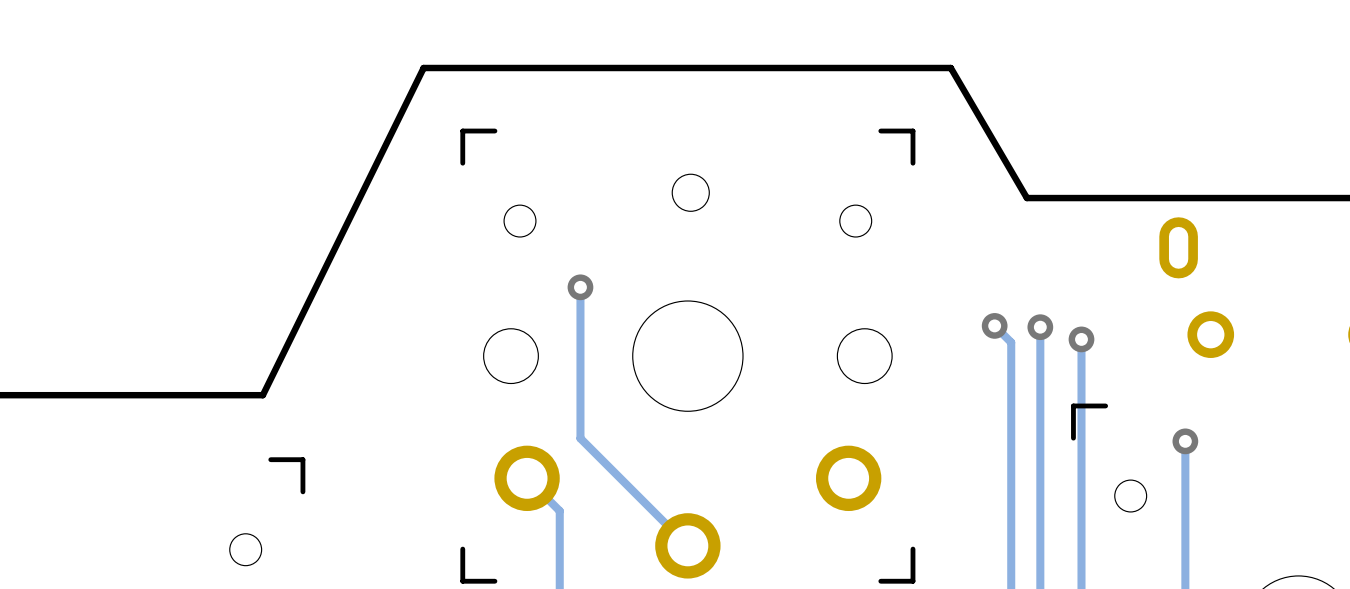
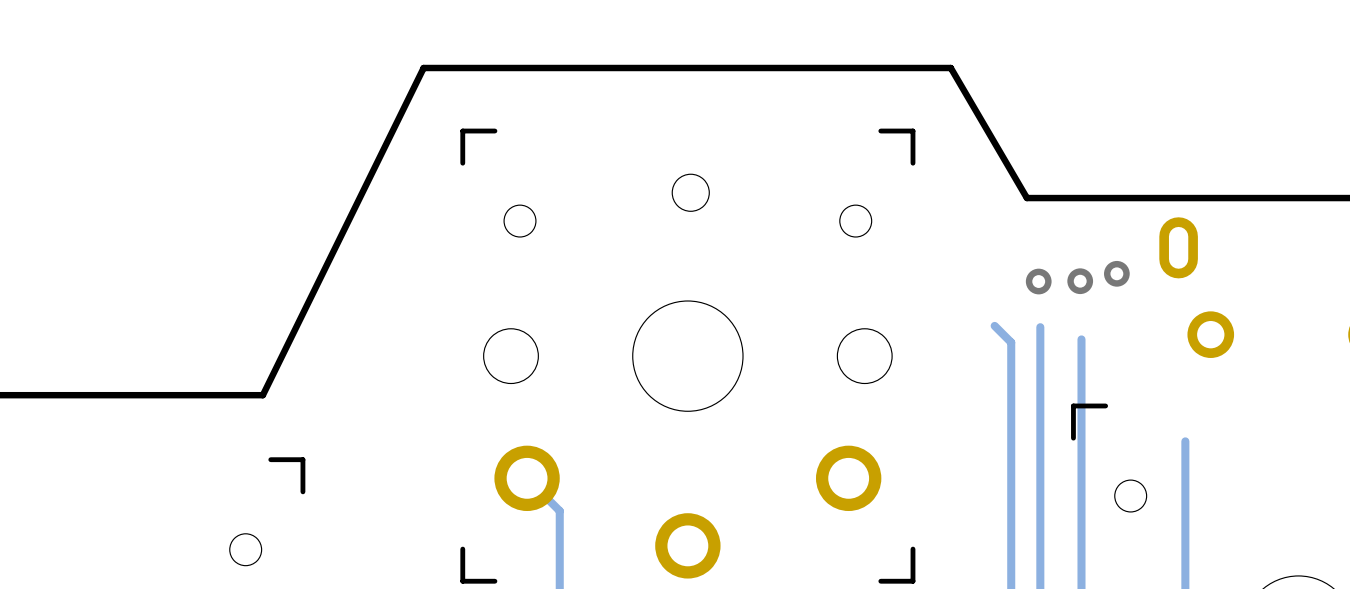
via: none -> (1116, 273)
via: none -> (1038, 281)
via: none -> (1080, 281)
track: (580, 287) (580, 438) (687, 545) -> none
via: (580, 287) -> none
via: (994, 325) -> none
via: (1040, 327) -> none
via: (1081, 339) -> none
via: (1185, 441) -> none

